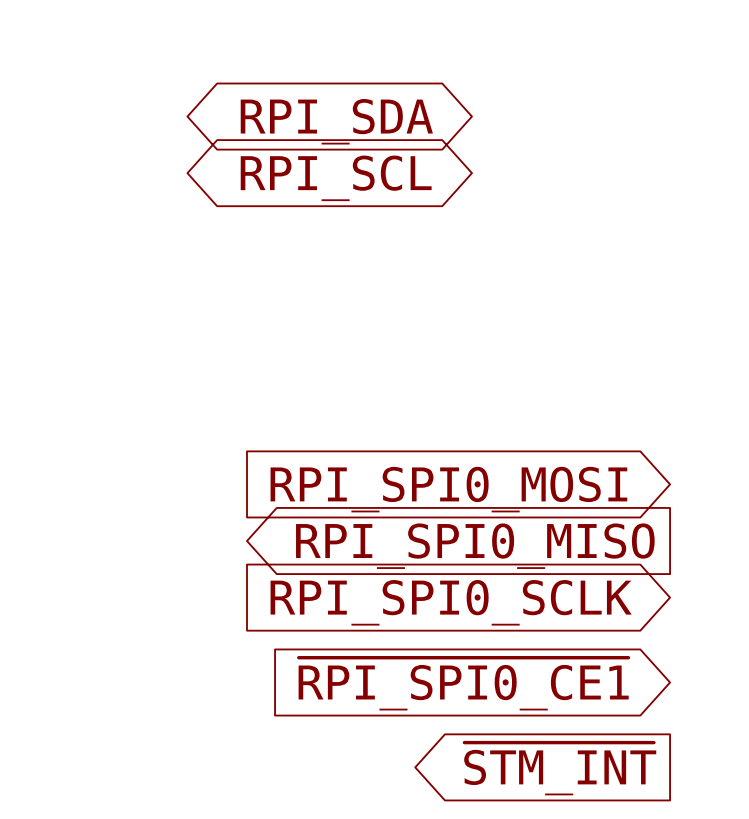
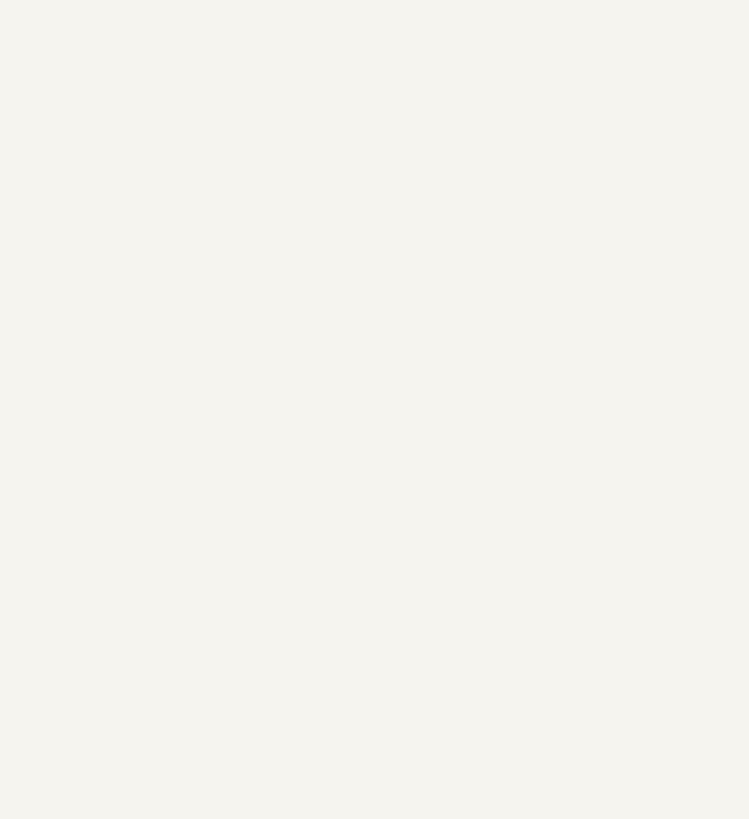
global label: RPI_SDA (336, 121) -> none
global label: RPI_SCL (336, 178) -> none
global label: RPI_SPI0_MOSI (448, 489) -> none
global label: RPI_SPI0_MISO (475, 546) -> none
global label: RPI_SPI0_SCLK (451, 602) -> none
global label: ~{RPI_SPI0_CE1} (463, 684) -> none
global label: ~{STM_INT} (560, 768) -> none

